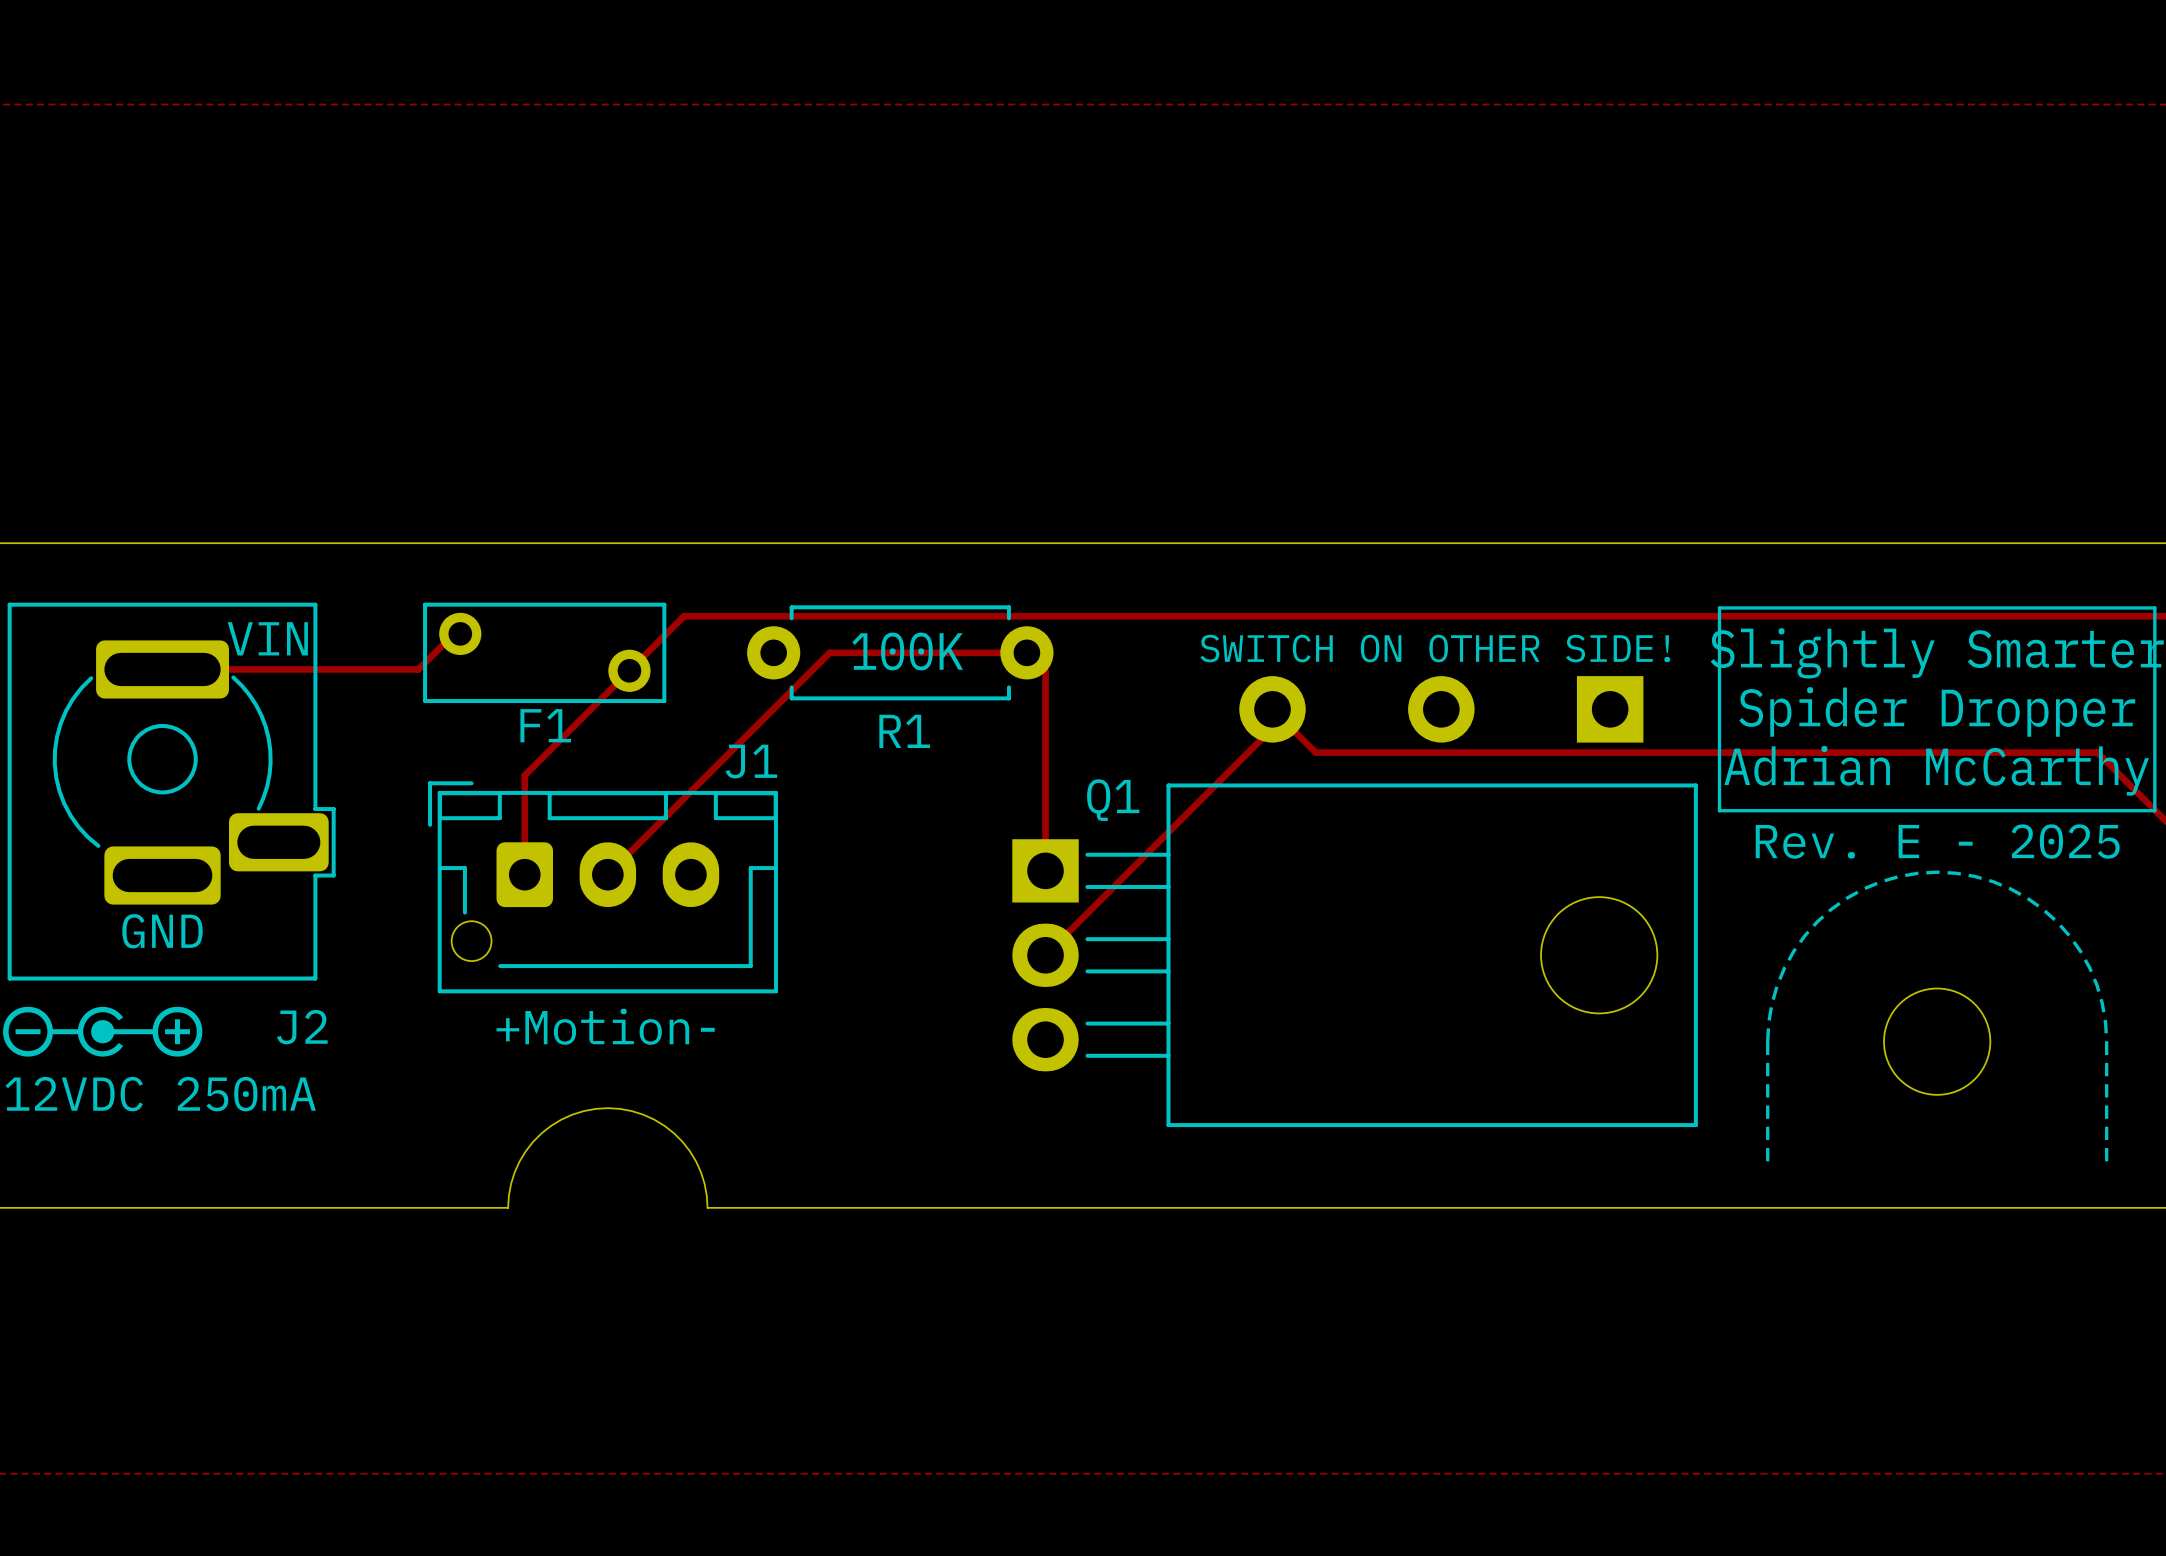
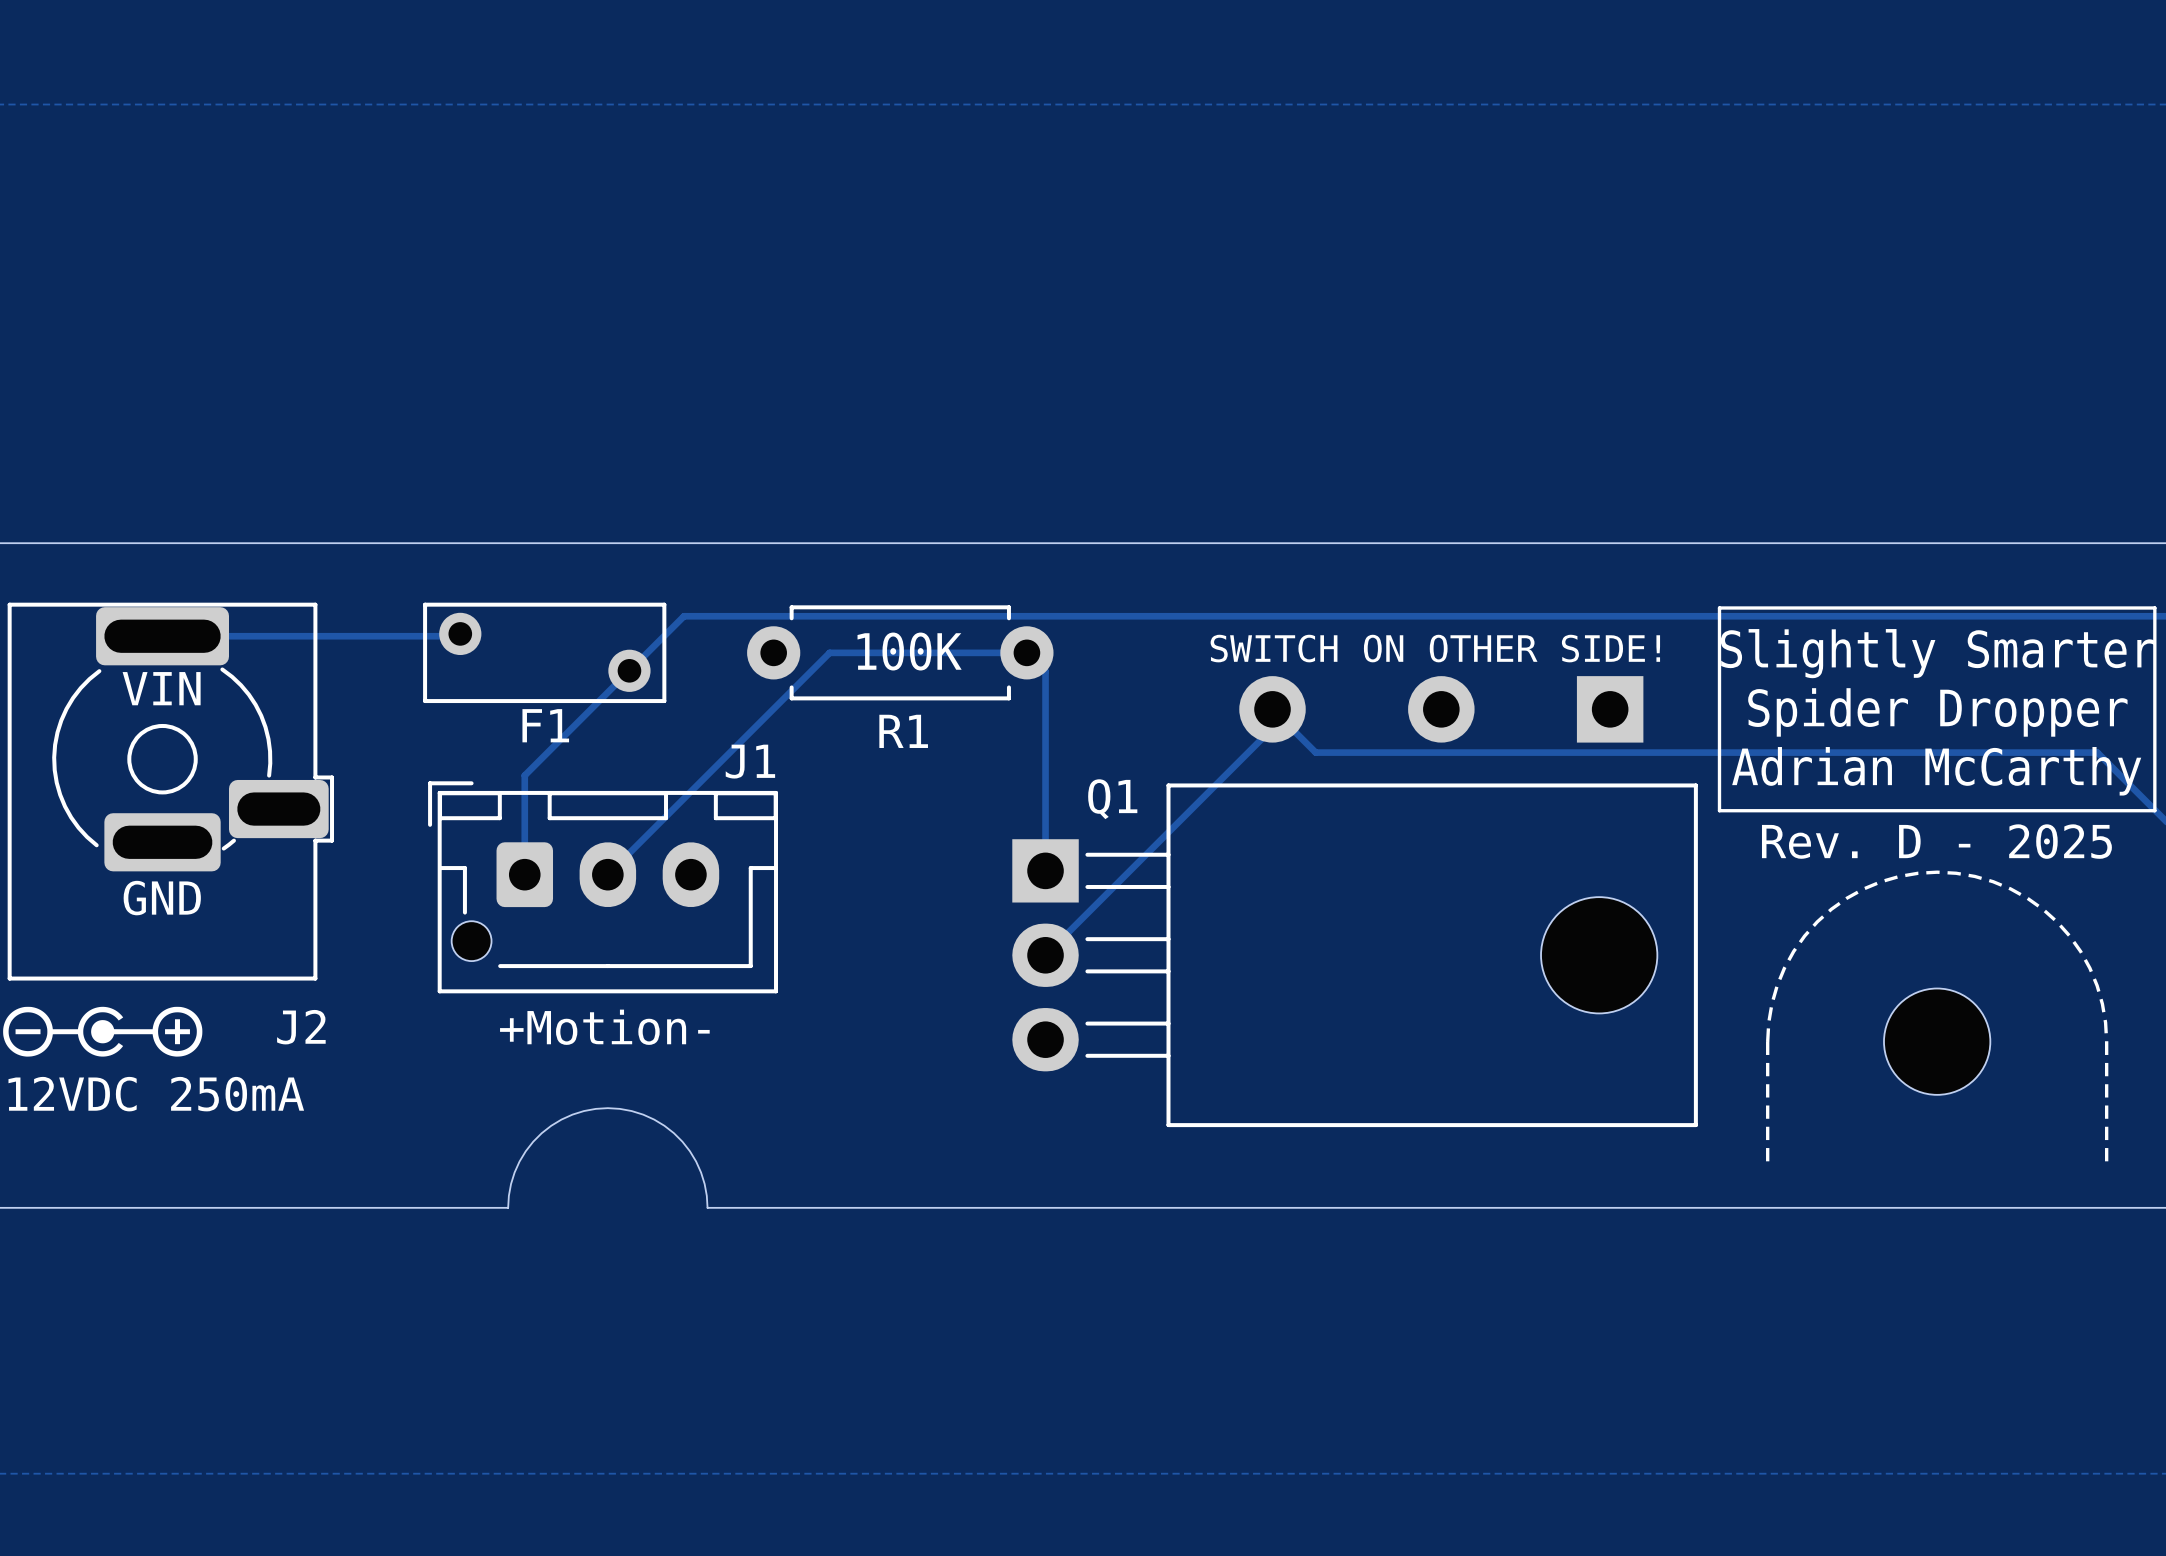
J2 footprint: [7, 602, 336, 981] -> [7, 602, 335, 981]
track: none -> (165, 632) (162, 636) (457, 636)
track: (460, 633) (453, 633) (418, 669) (162, 669) -> none
text position: VIN (267, 638) -> VIN (161, 688)
text: Rev. E - 2025 (1937, 841) -> Rev. D - 2025 (1936, 841)
text position: GND (162, 931) -> GND (162, 898)

